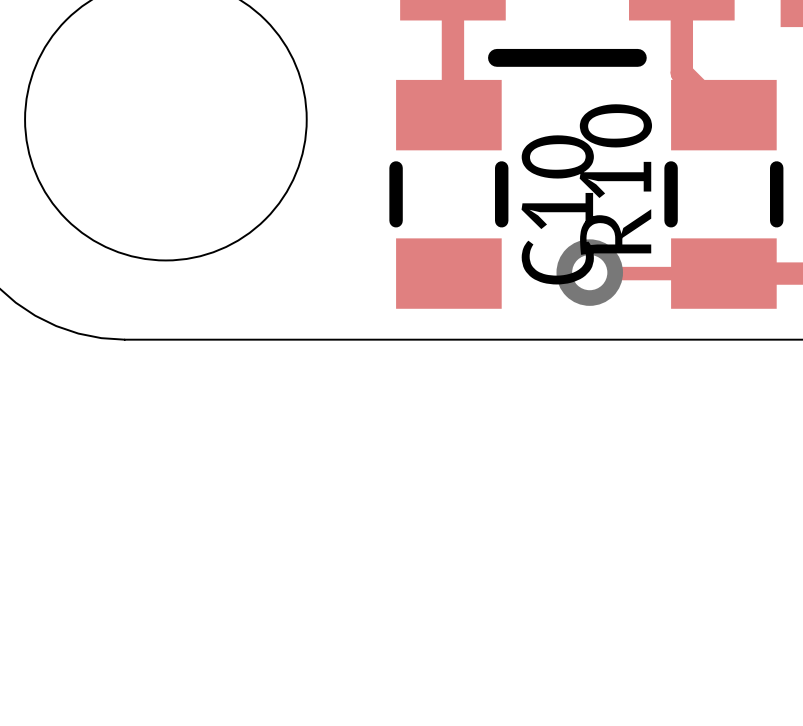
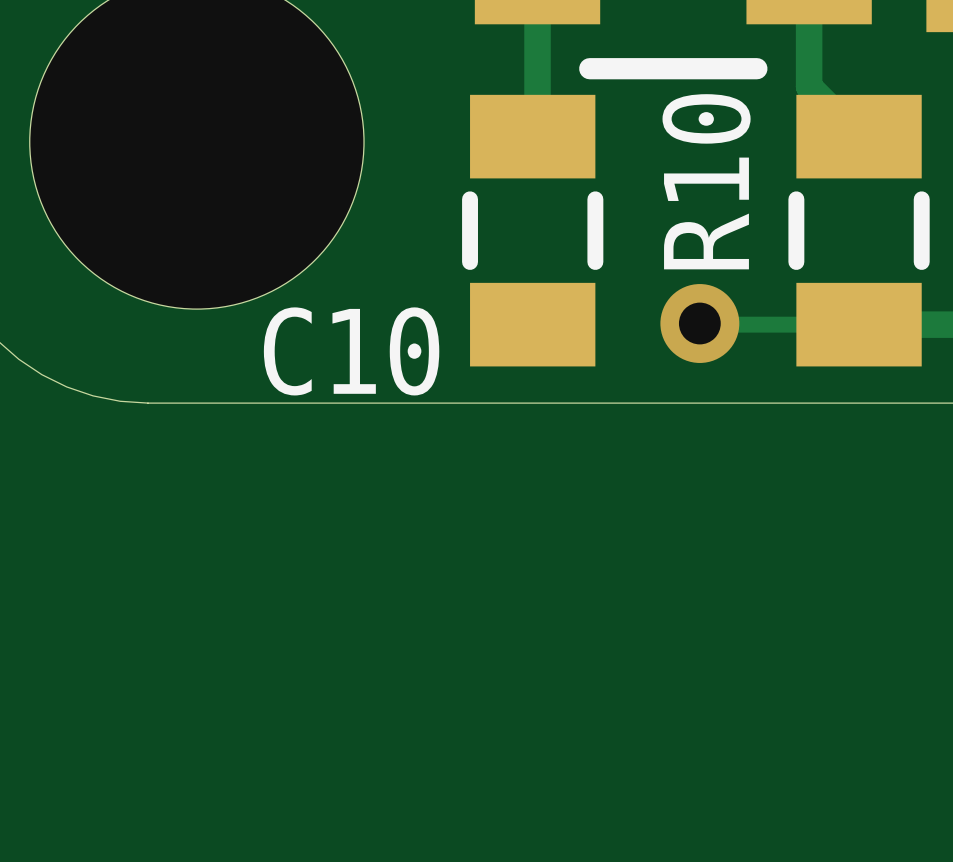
R10 name position: R10 (615, 179) -> R10 (706, 181)
C10 name rotation: 0° (557, 209) -> 90° clockwise (351, 351)
C10 name position: C10 (557, 209) -> C10 (351, 351)

